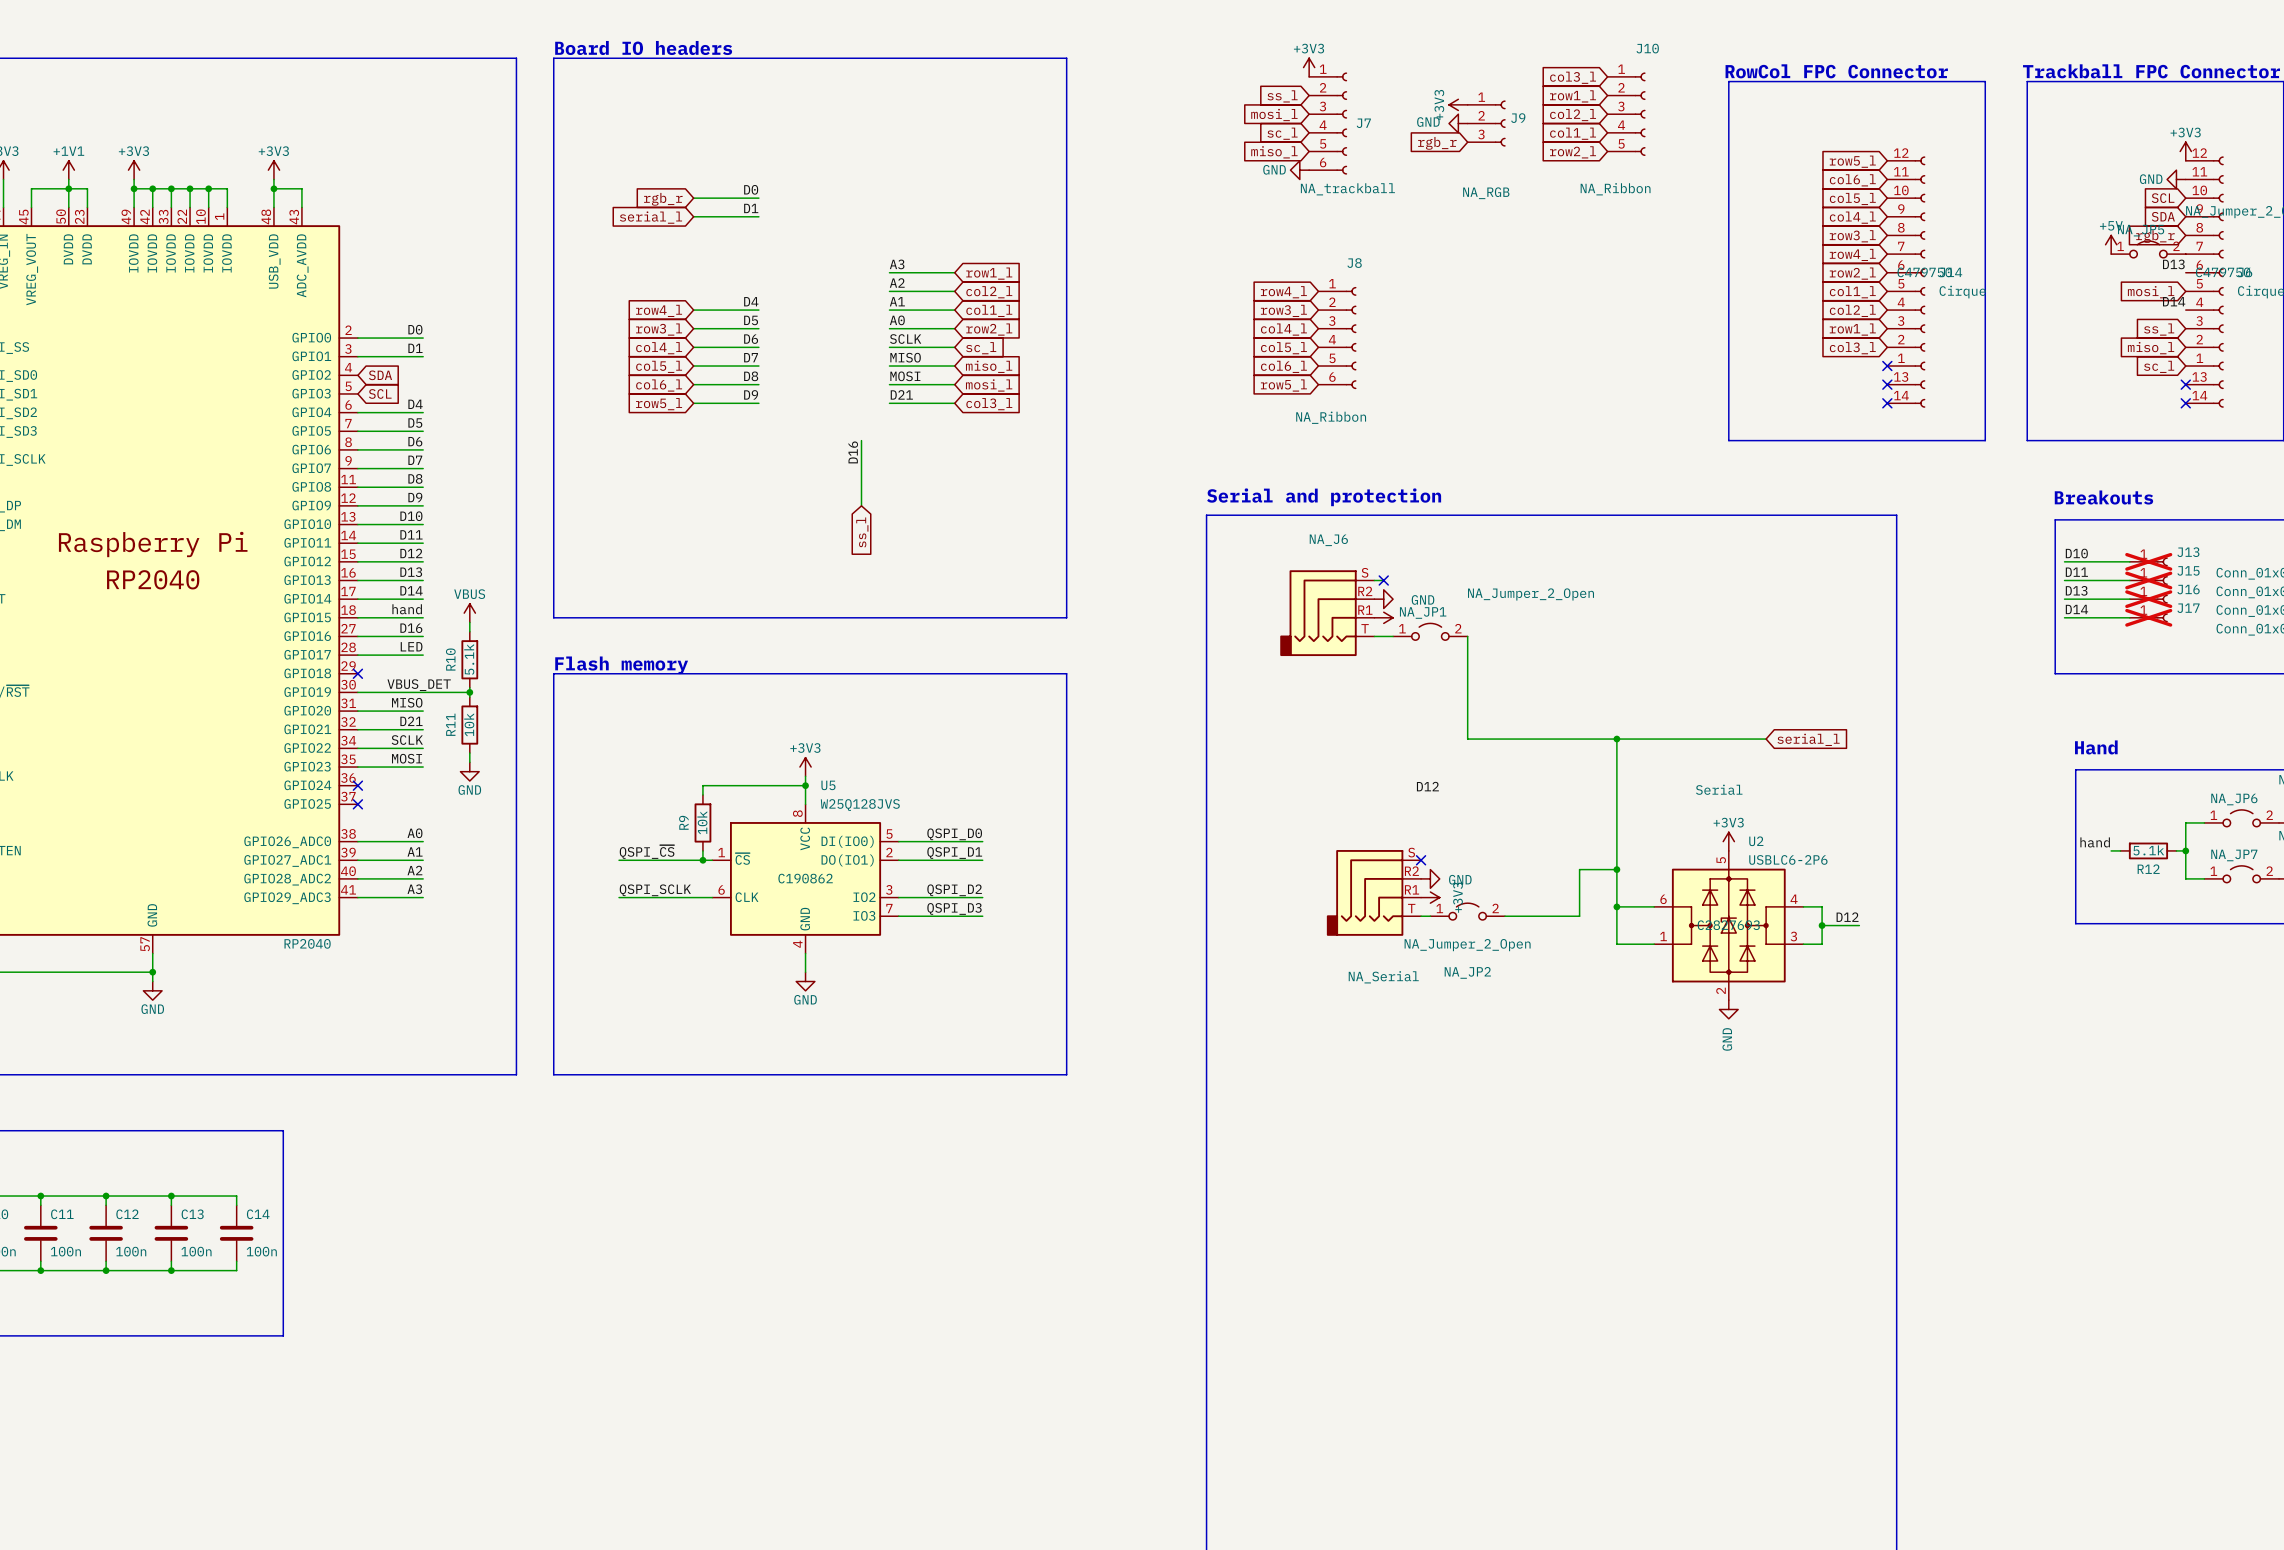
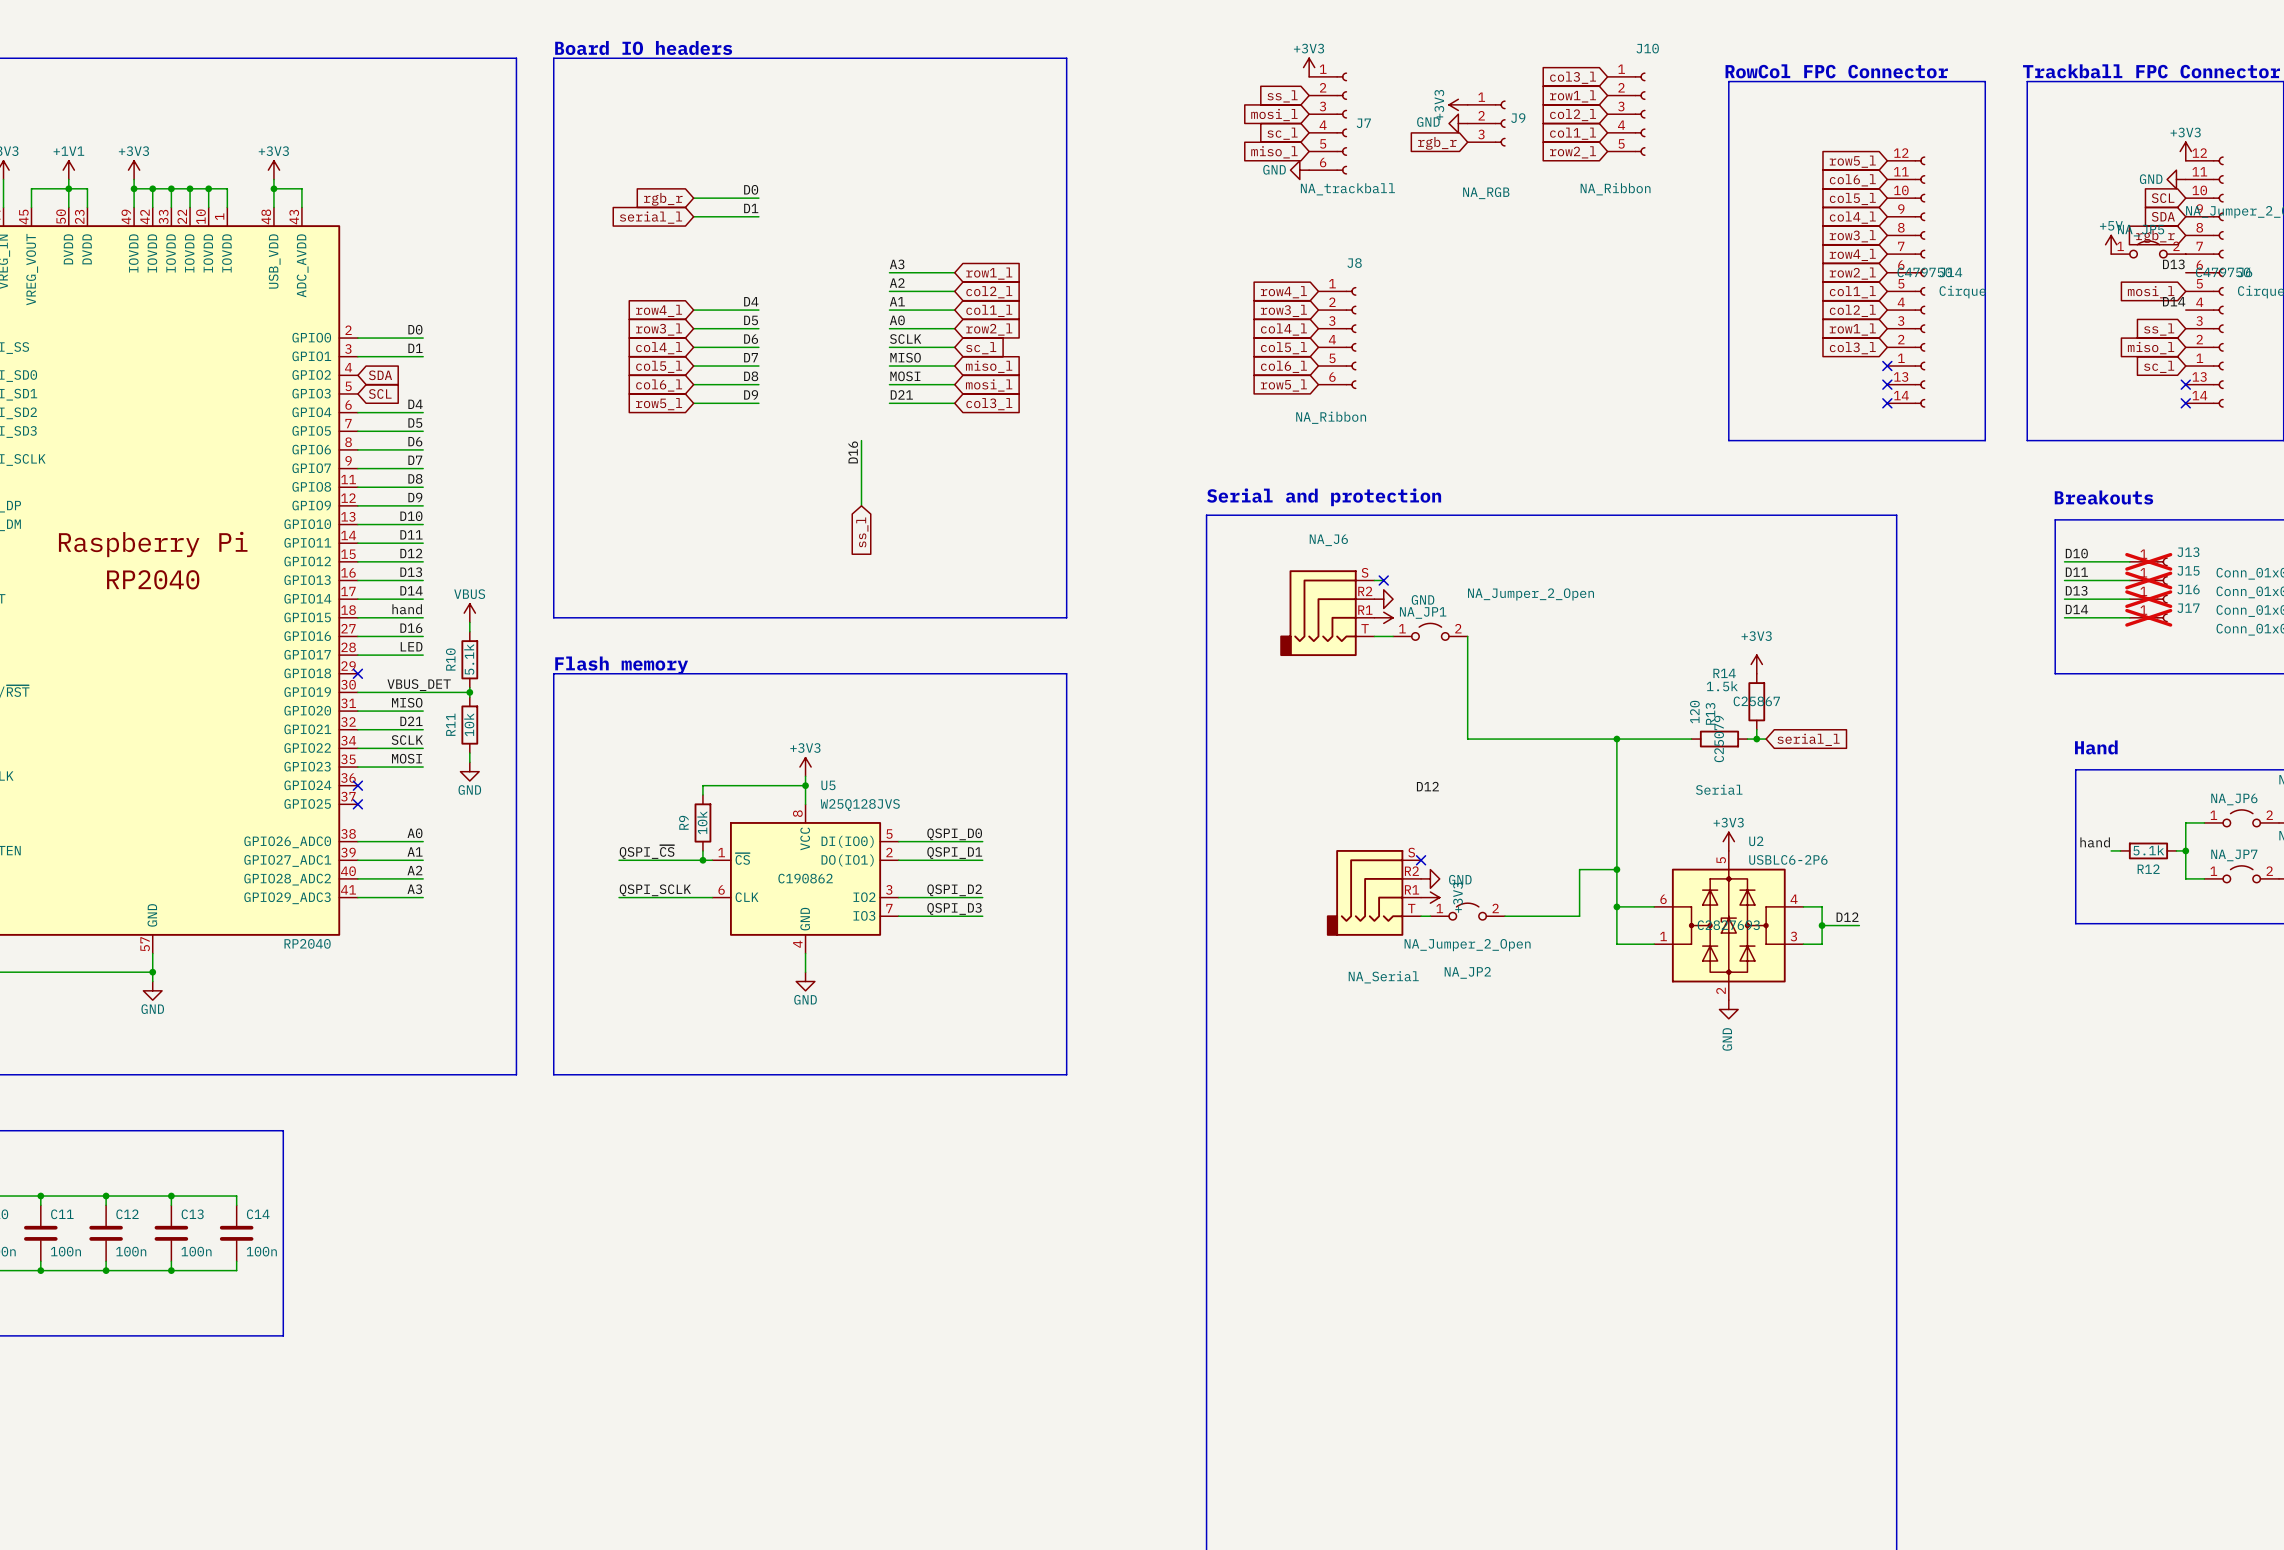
power symbol: none -> +3V3 (1756, 664)
R14: none -> 1.5k (1756, 701)
wire: none -> (1756, 729) (1756, 739)
wire: (1691, 739) (1747, 739) -> none
R13: none -> 120 (1719, 739)
junction: none -> (1756, 739)

